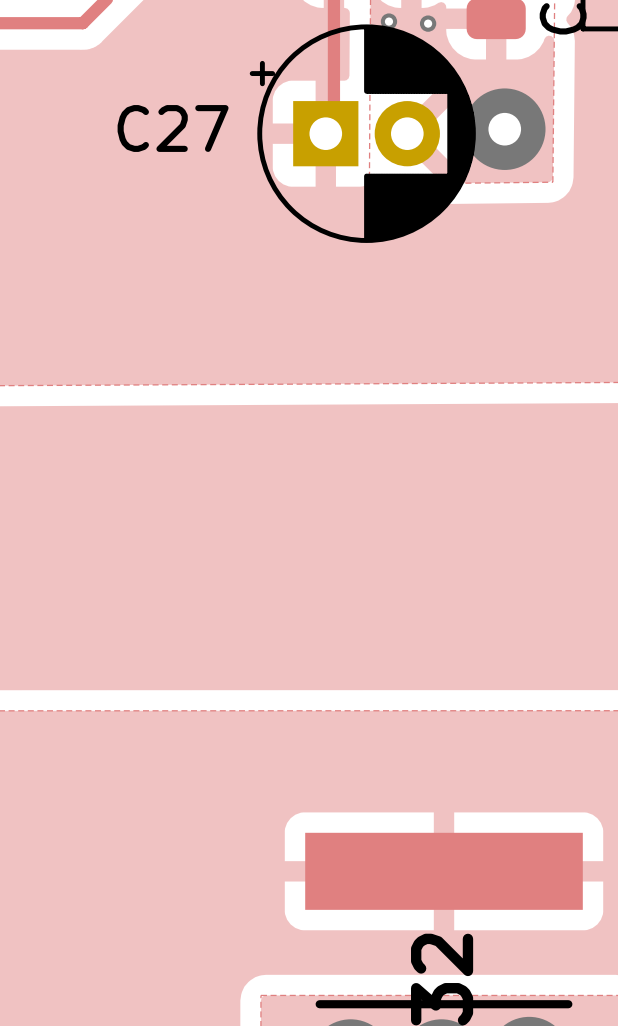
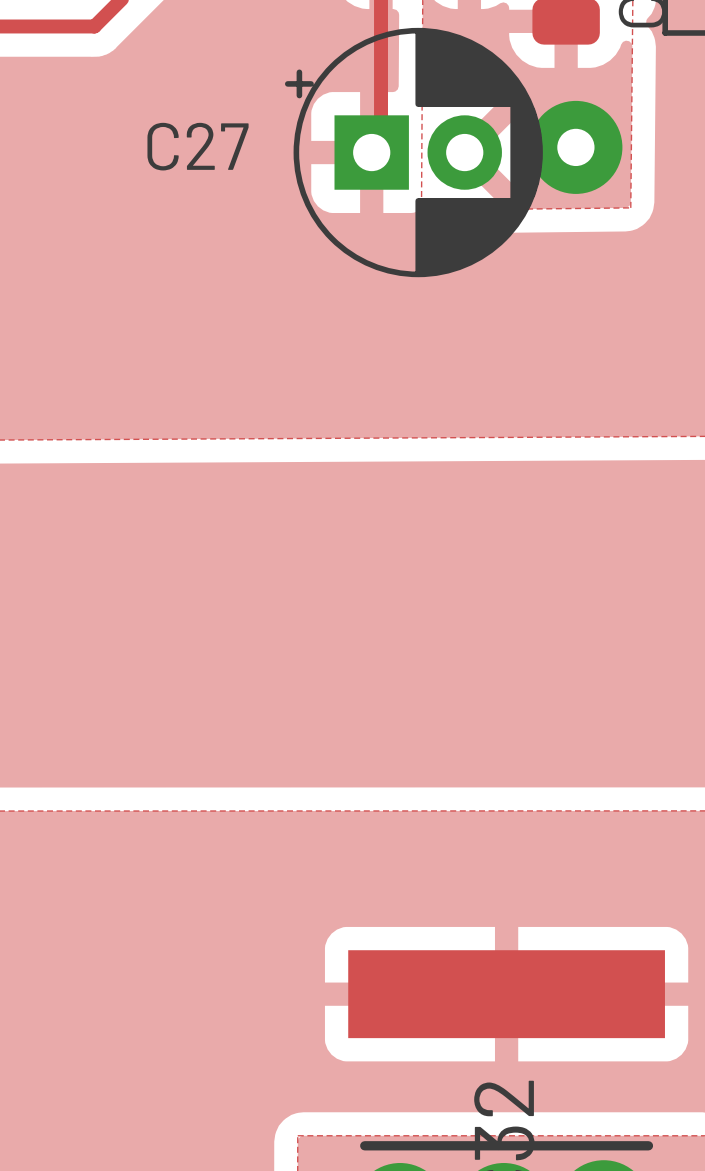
via: (388, 21) -> none
via: (428, 23) -> none

